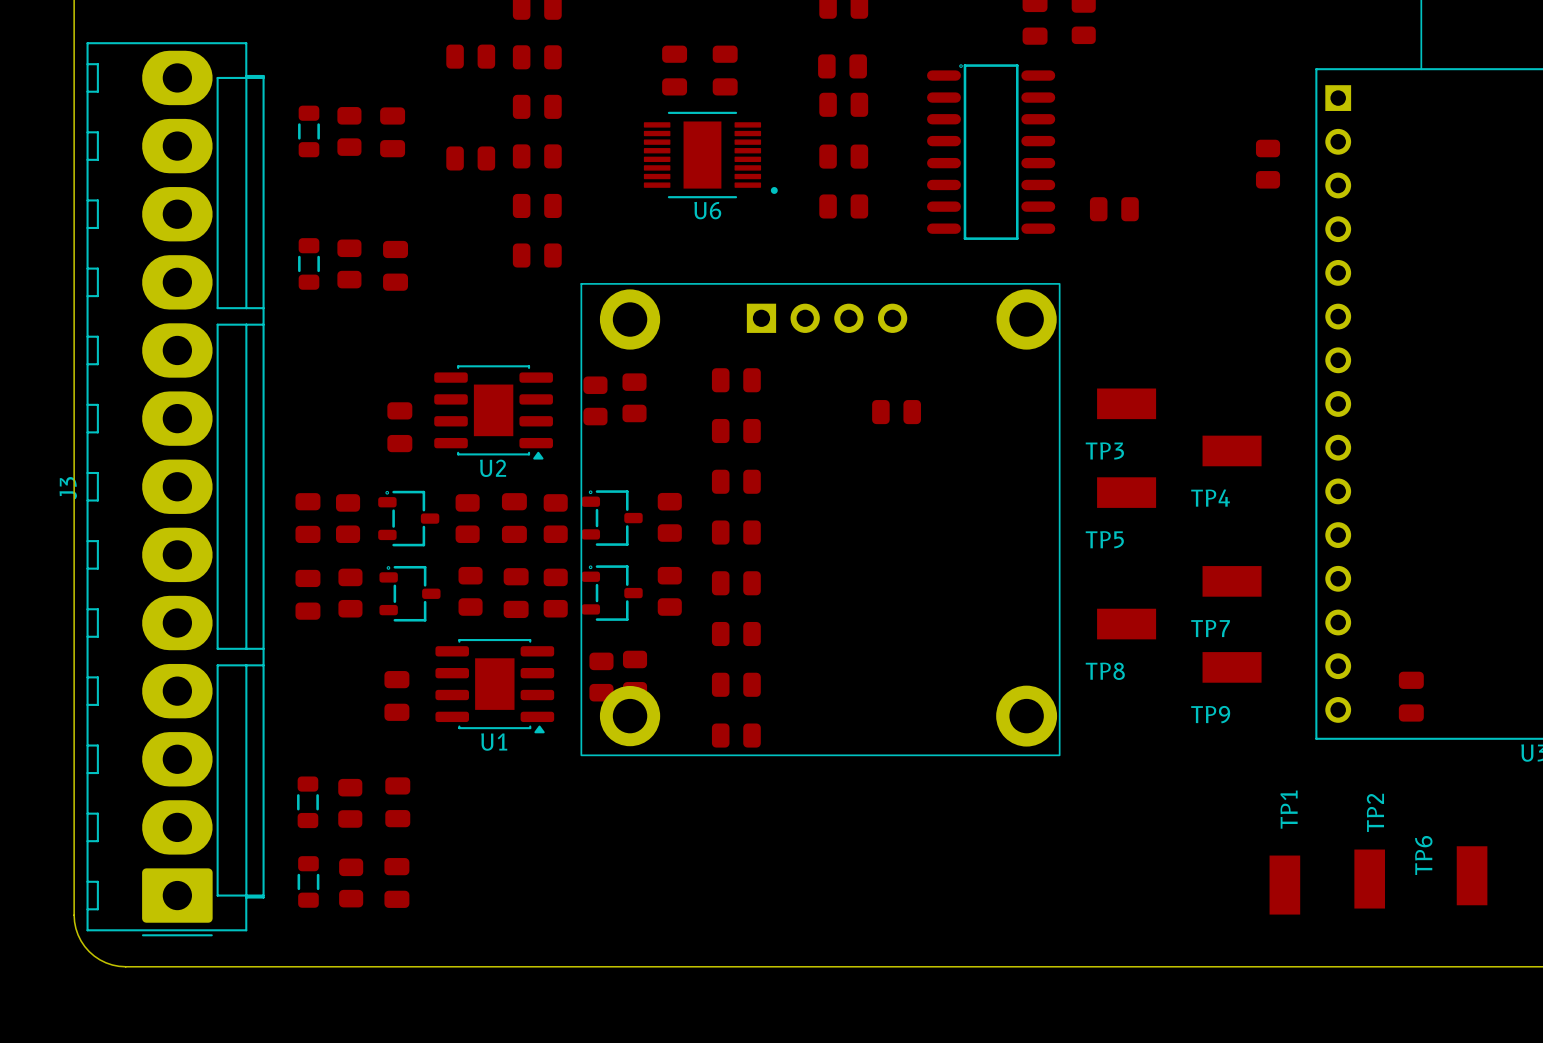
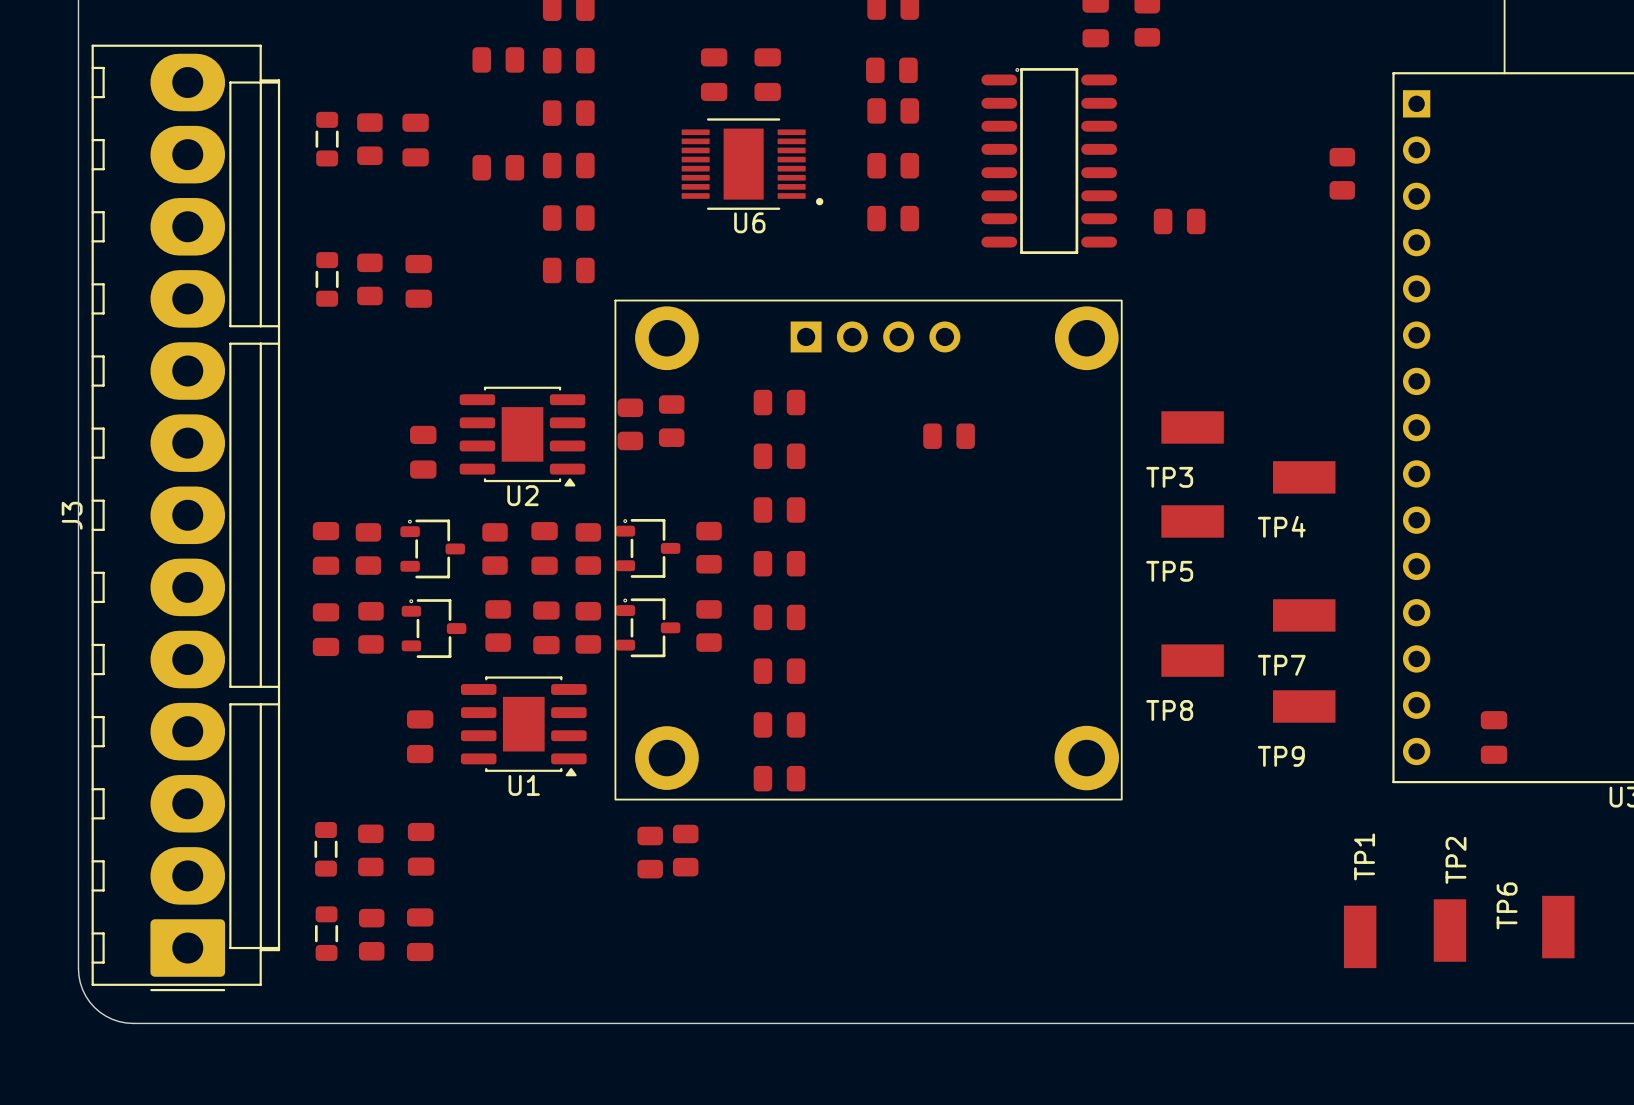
part: (635, 675) -> none
part: (601, 677) -> none
part: none -> (685, 850)
part: none -> (650, 852)

